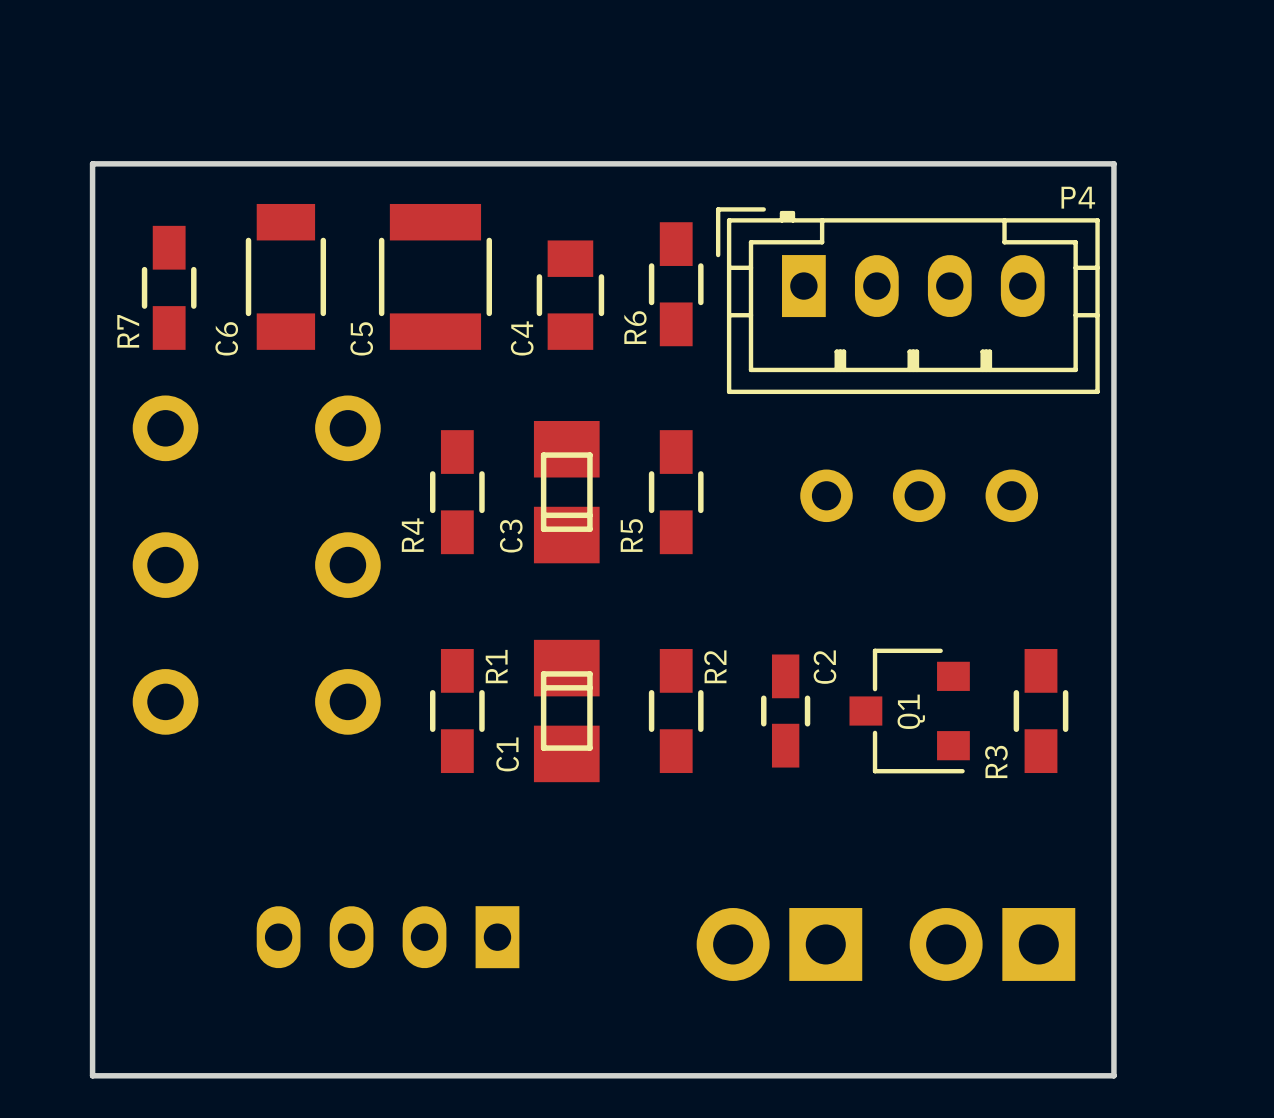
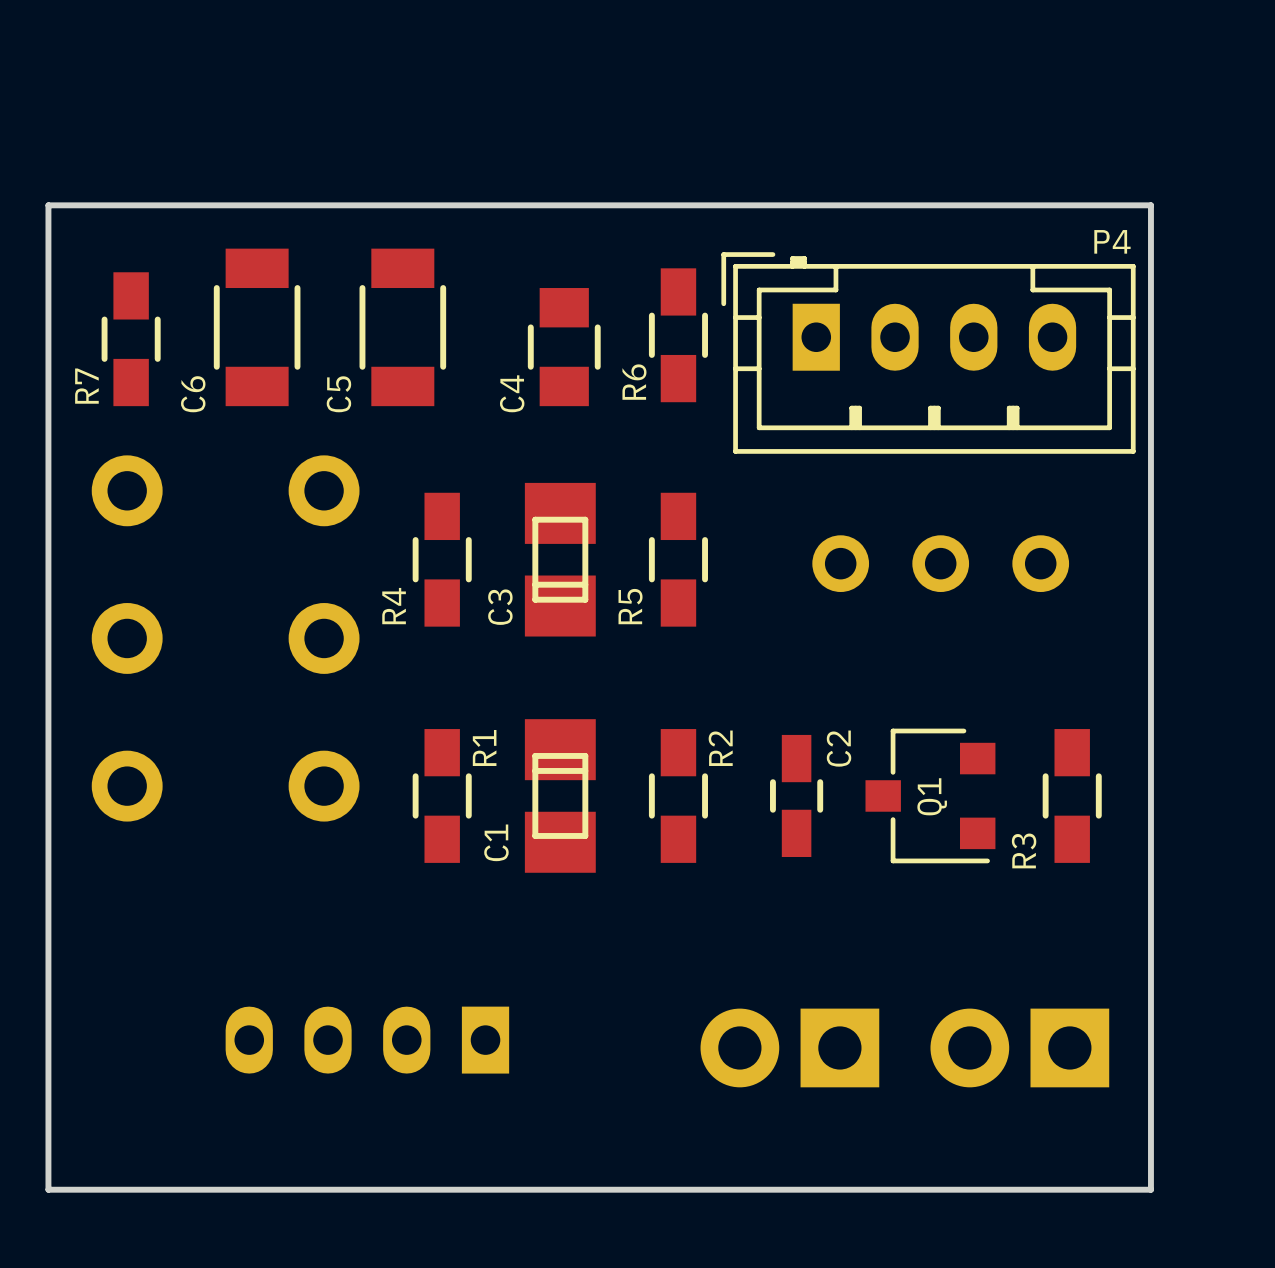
C5 footprint: [378, 203, 493, 350] -> [359, 248, 447, 407]

